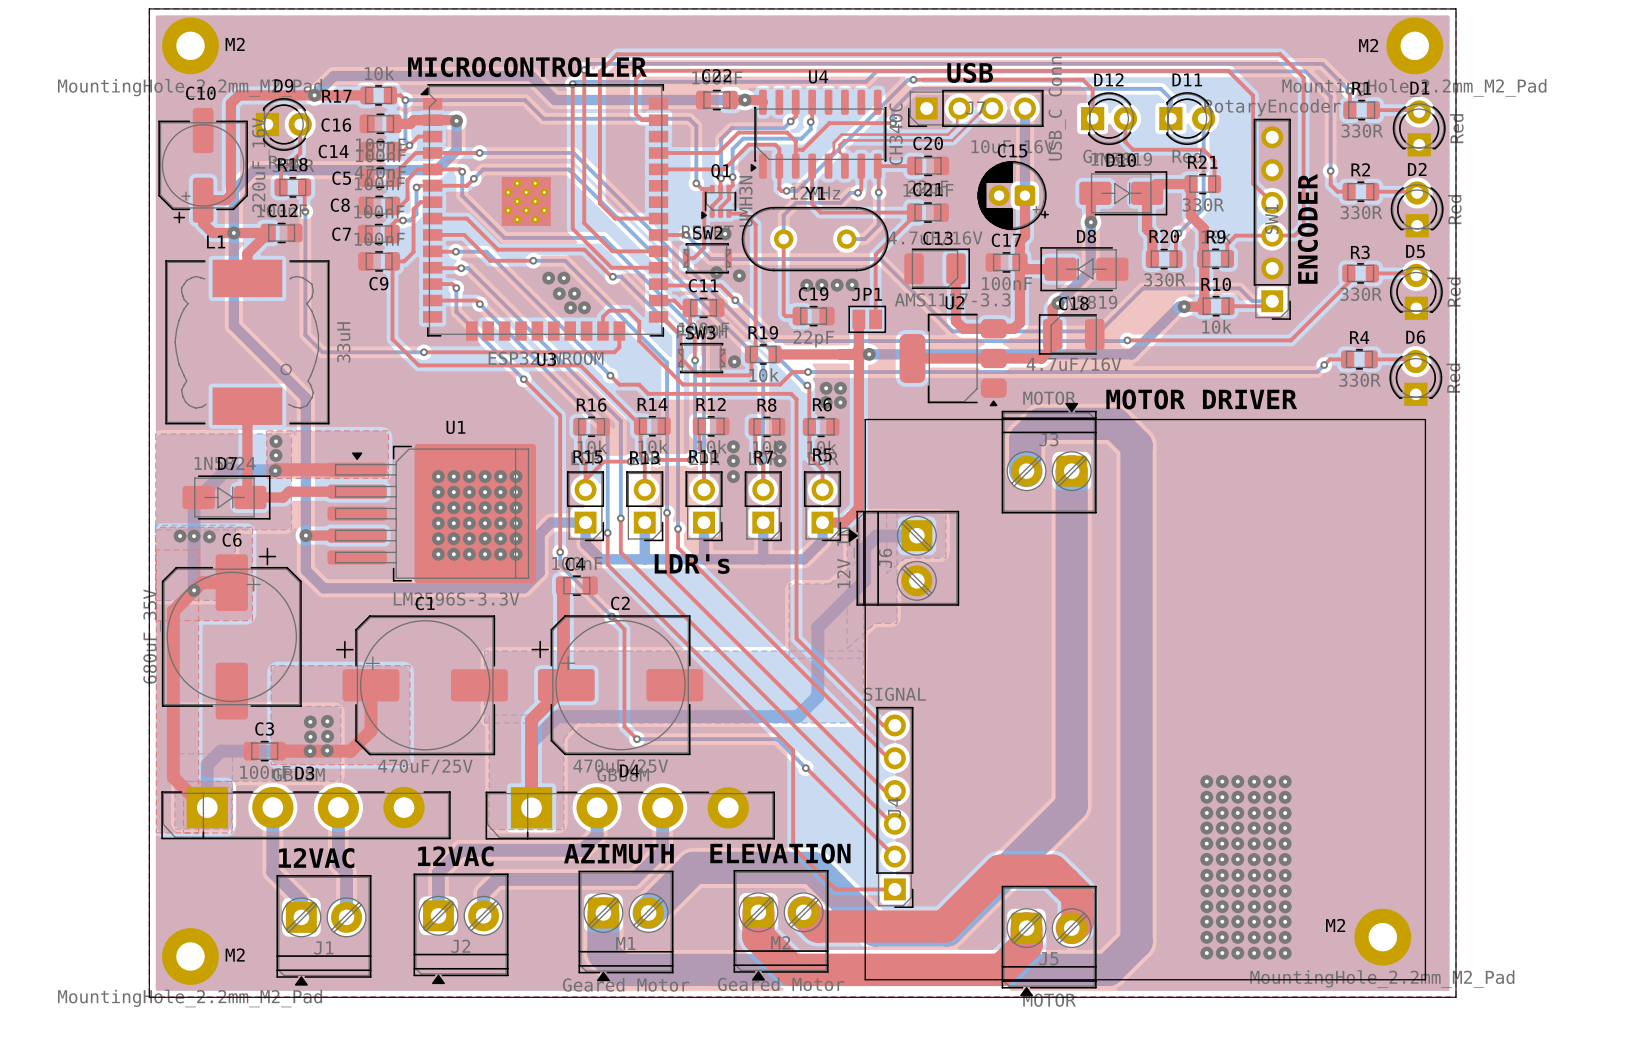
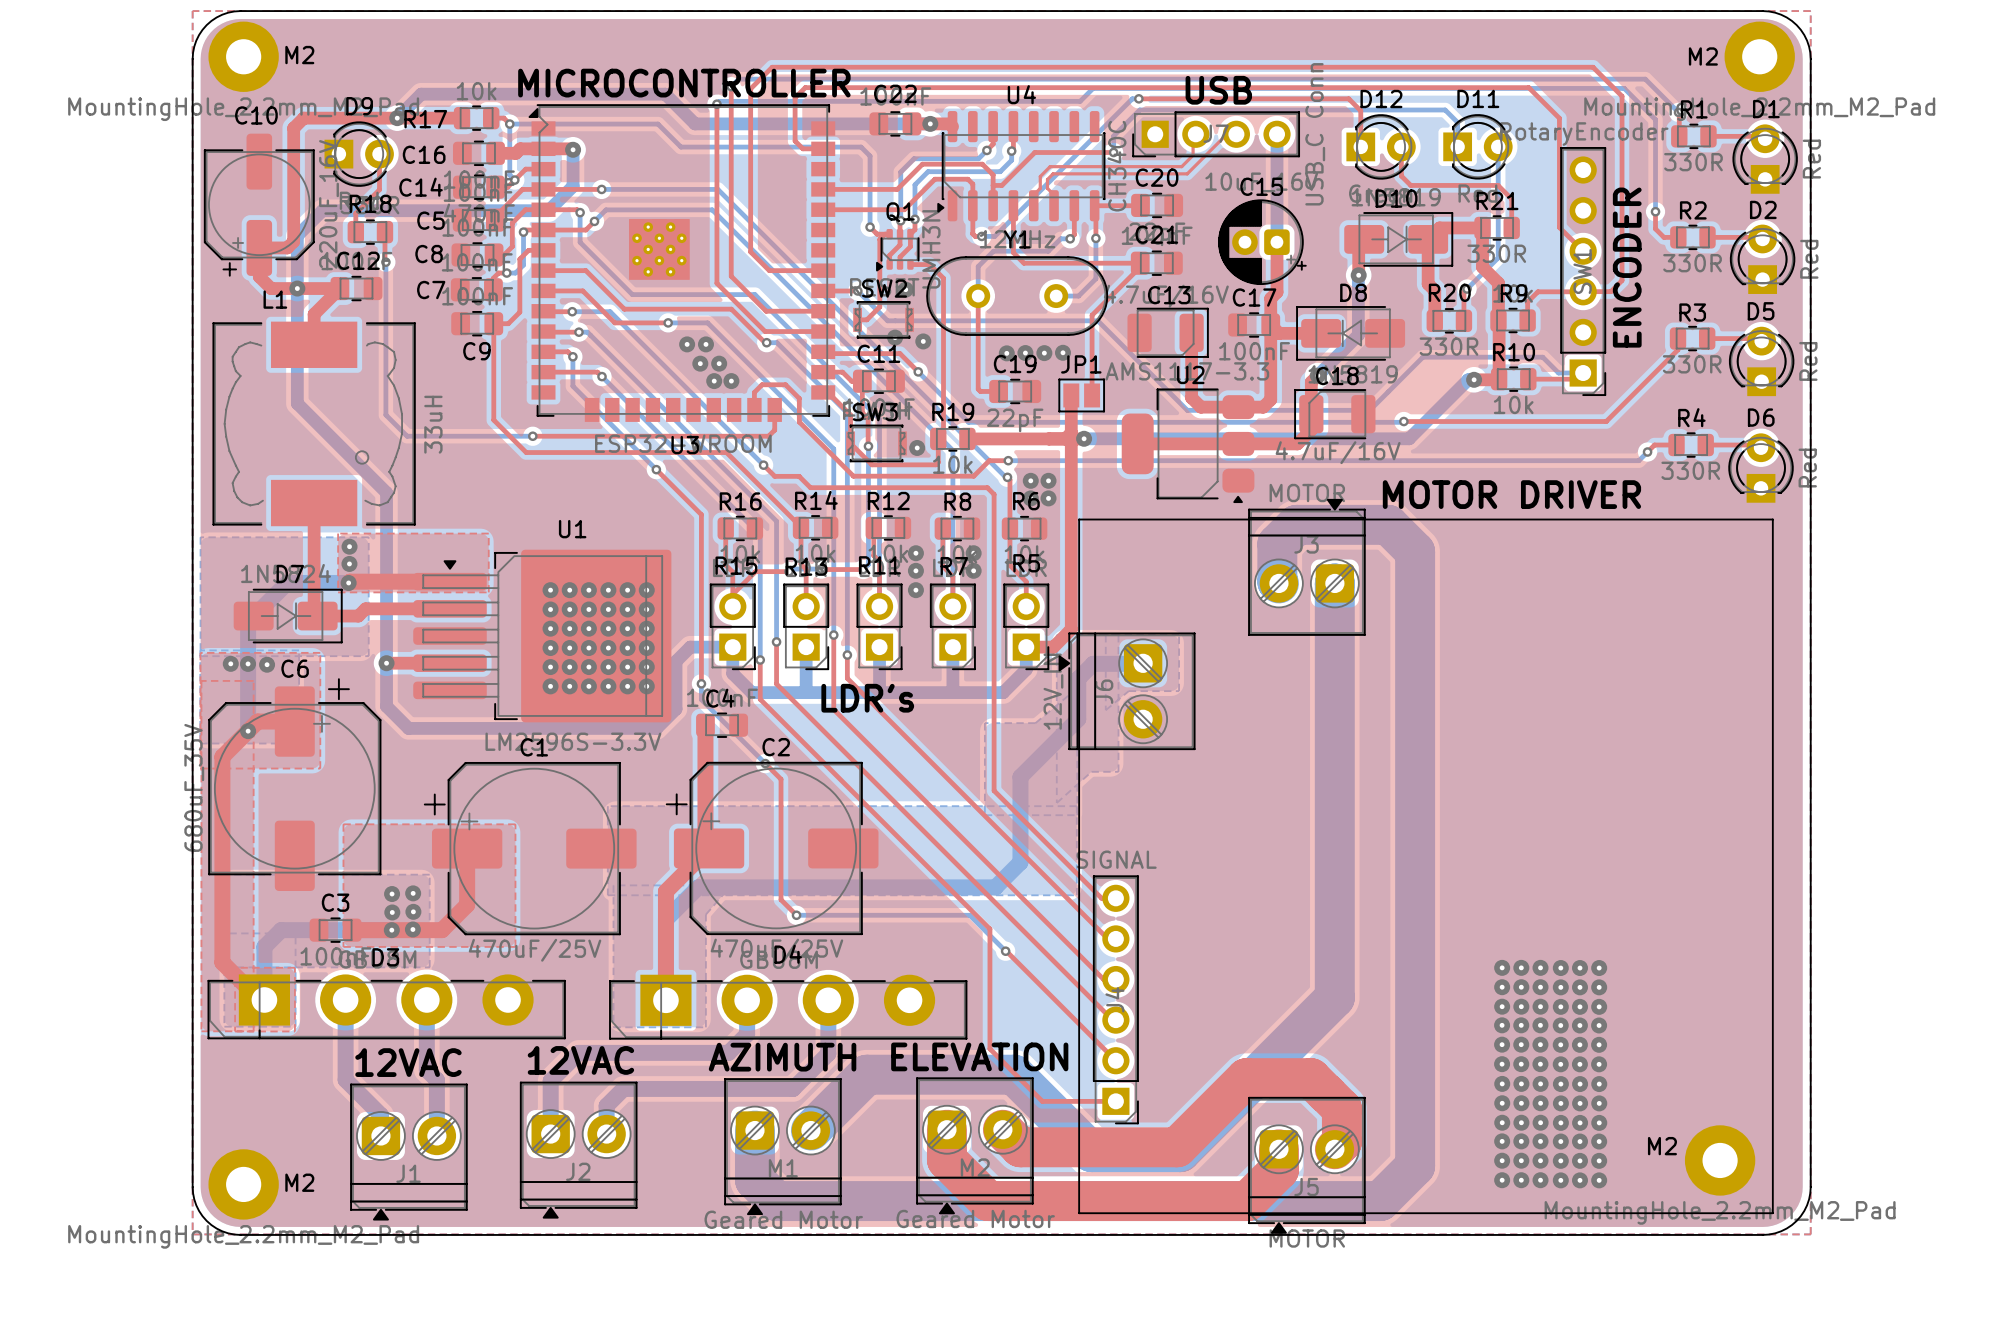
board edge: (188, 8) (149, 8) (149, 47) -> (240, 11) (222, 14) (206, 25) (196, 40) (192, 59)
board edge: (1417, 8) (1456, 8) (1456, 47) -> (1762, 11) (1781, 14) (1796, 25) (1807, 40) (1810, 59)
board edge: (149, 958) (149, 997) (188, 997) -> (192, 1187) (196, 1205) (206, 1220) (222, 1231) (240, 1234)
board edge: (1456, 958) (1456, 997) (1417, 997) -> (1810, 1187) (1807, 1205) (1796, 1220) (1781, 1231) (1762, 1234)

